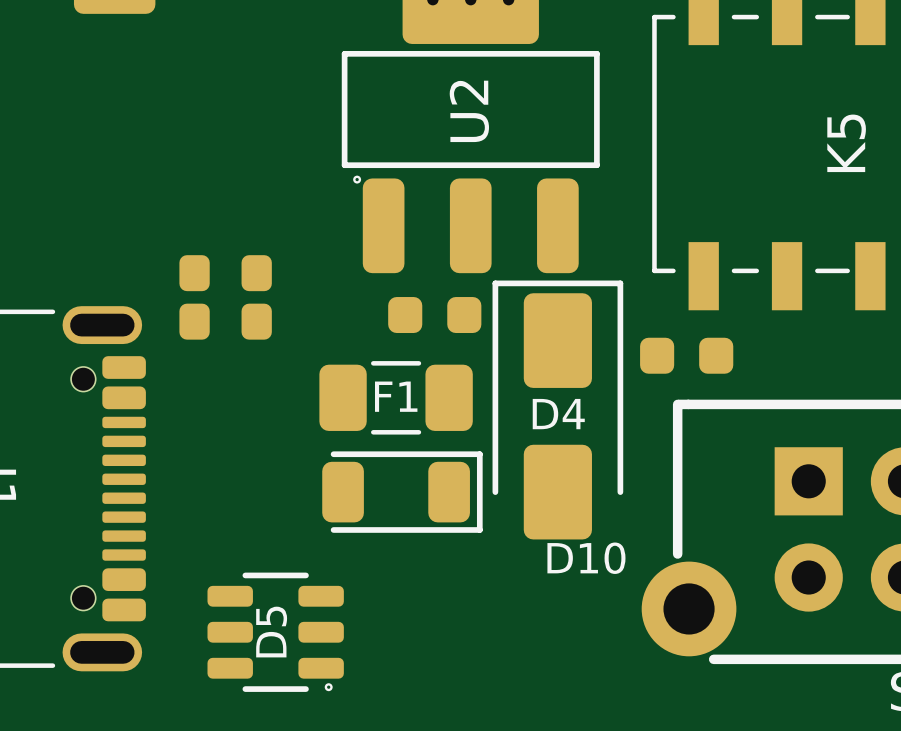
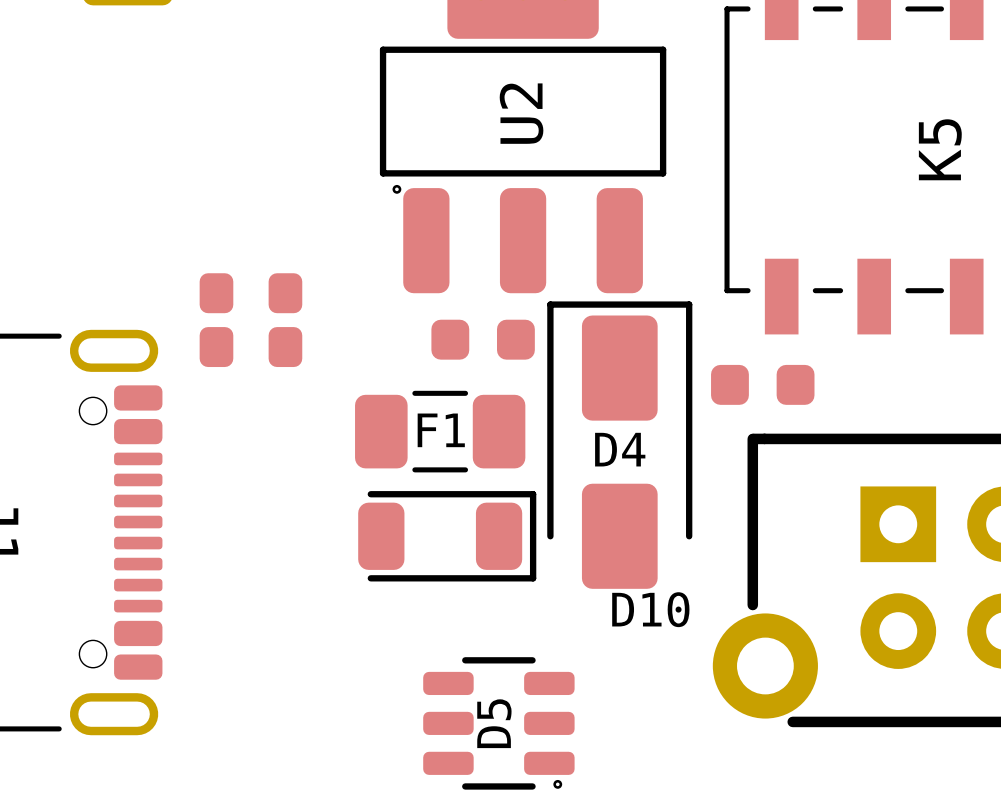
D5 position: (275, 632) -> (498, 723)

